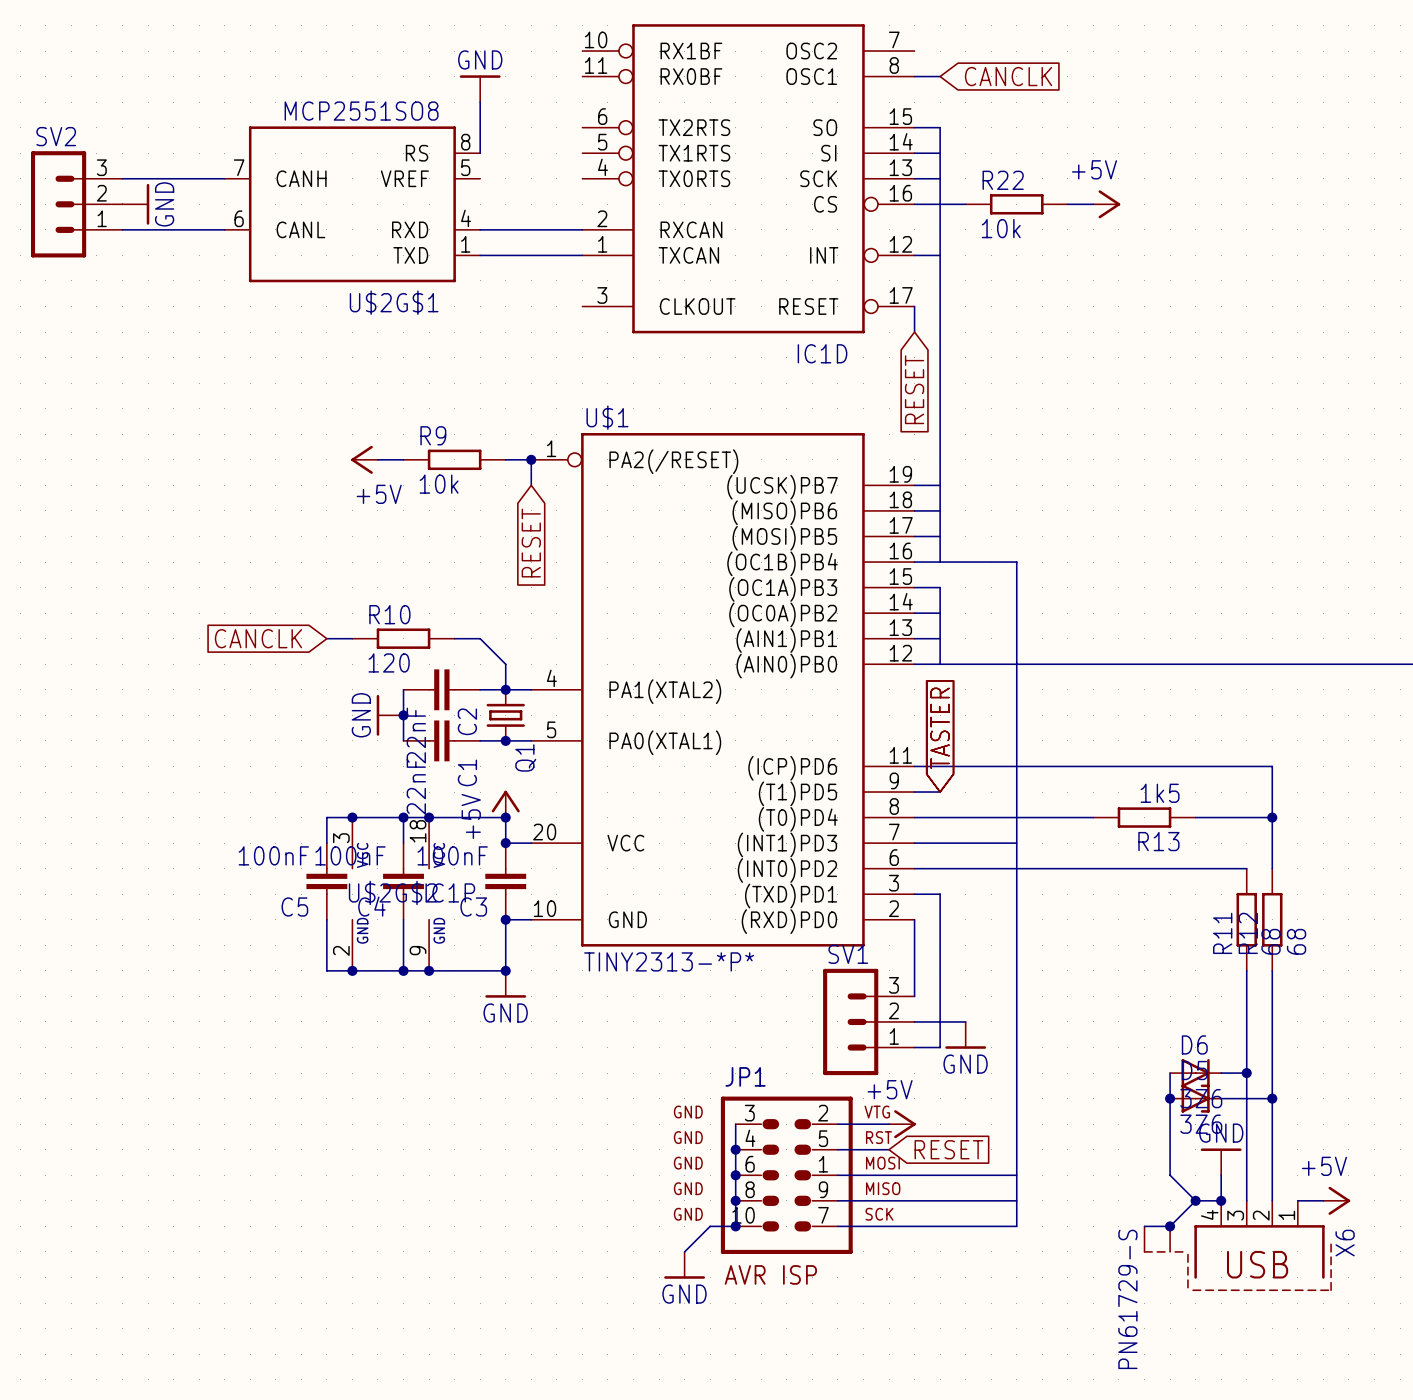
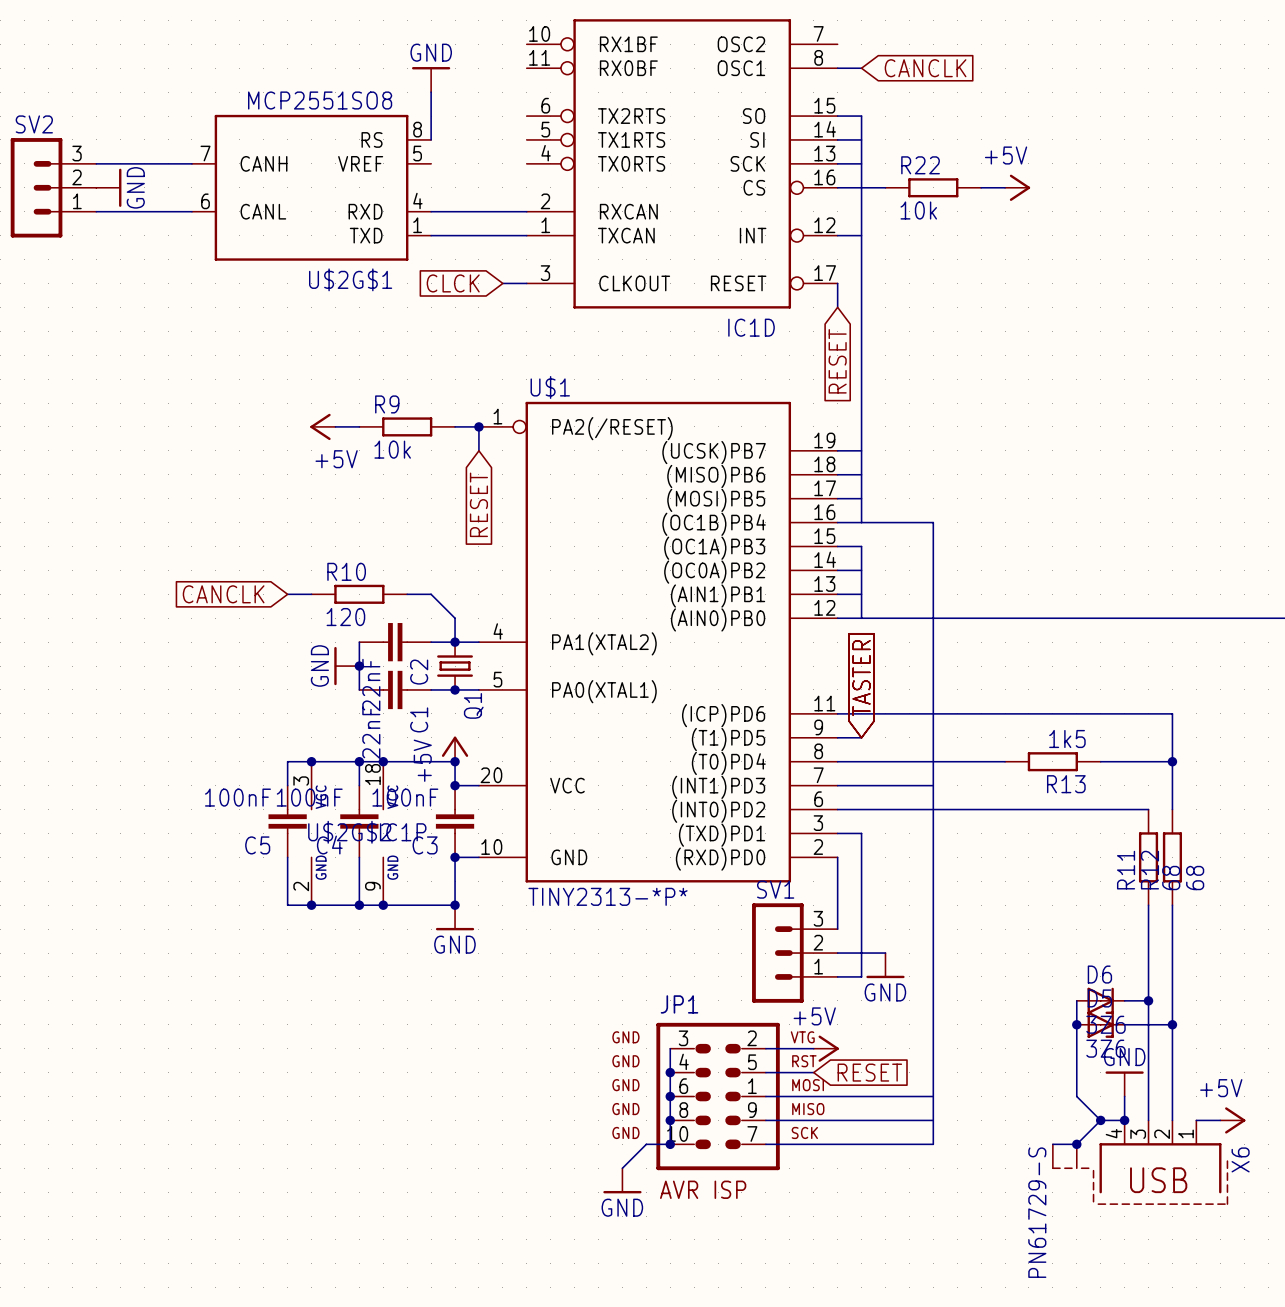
global label: none -> CLCK (453, 283)
wire: none -> (502, 283) (526, 283)

